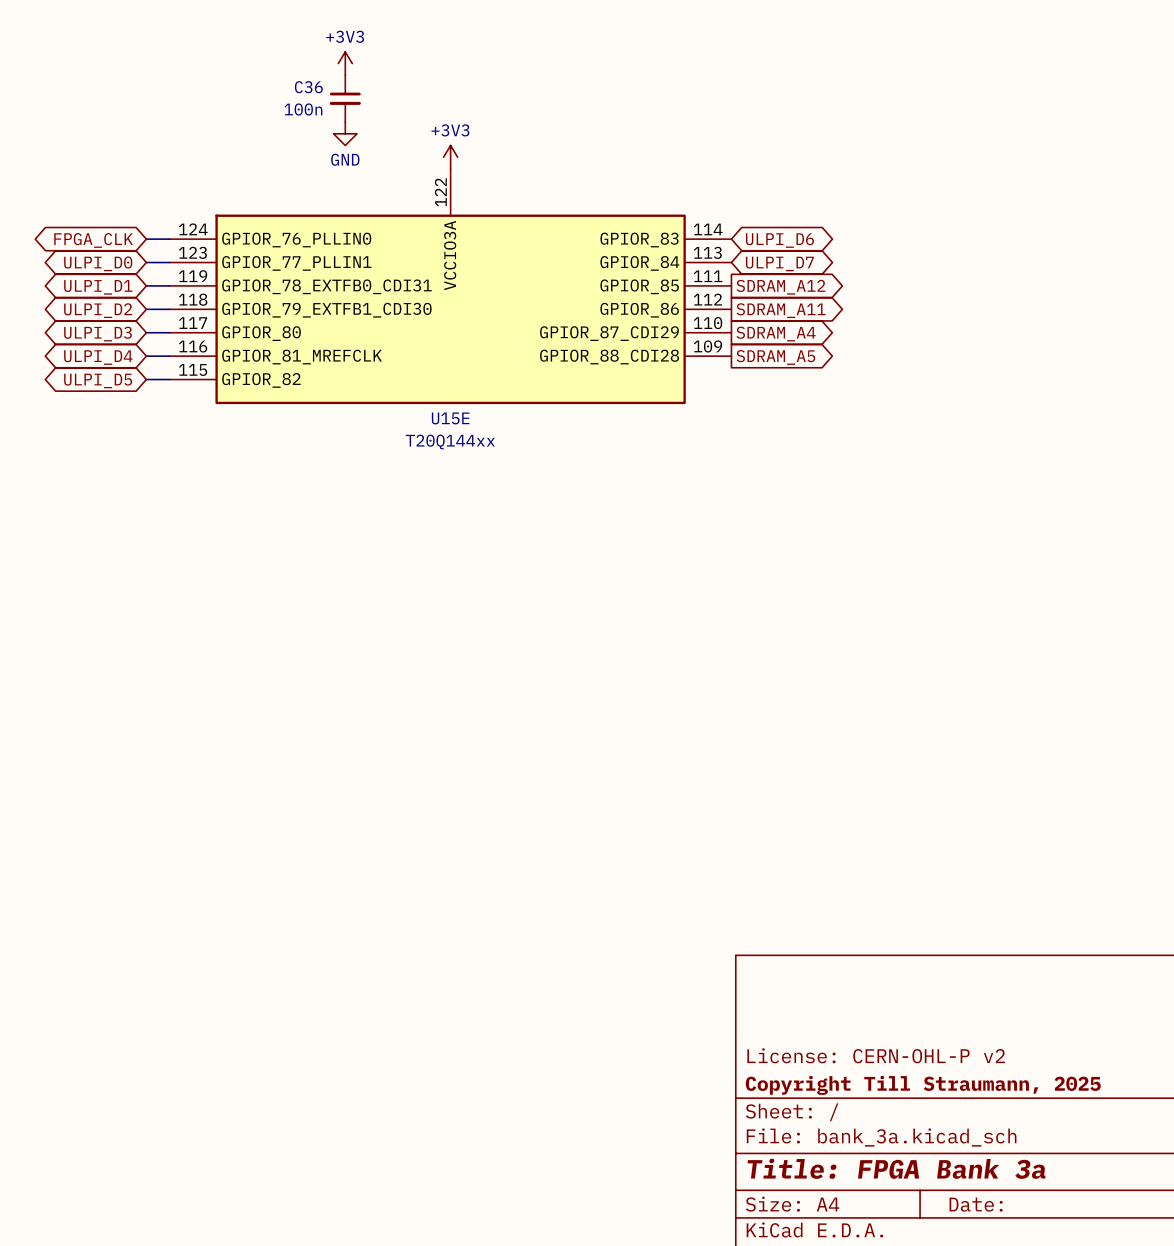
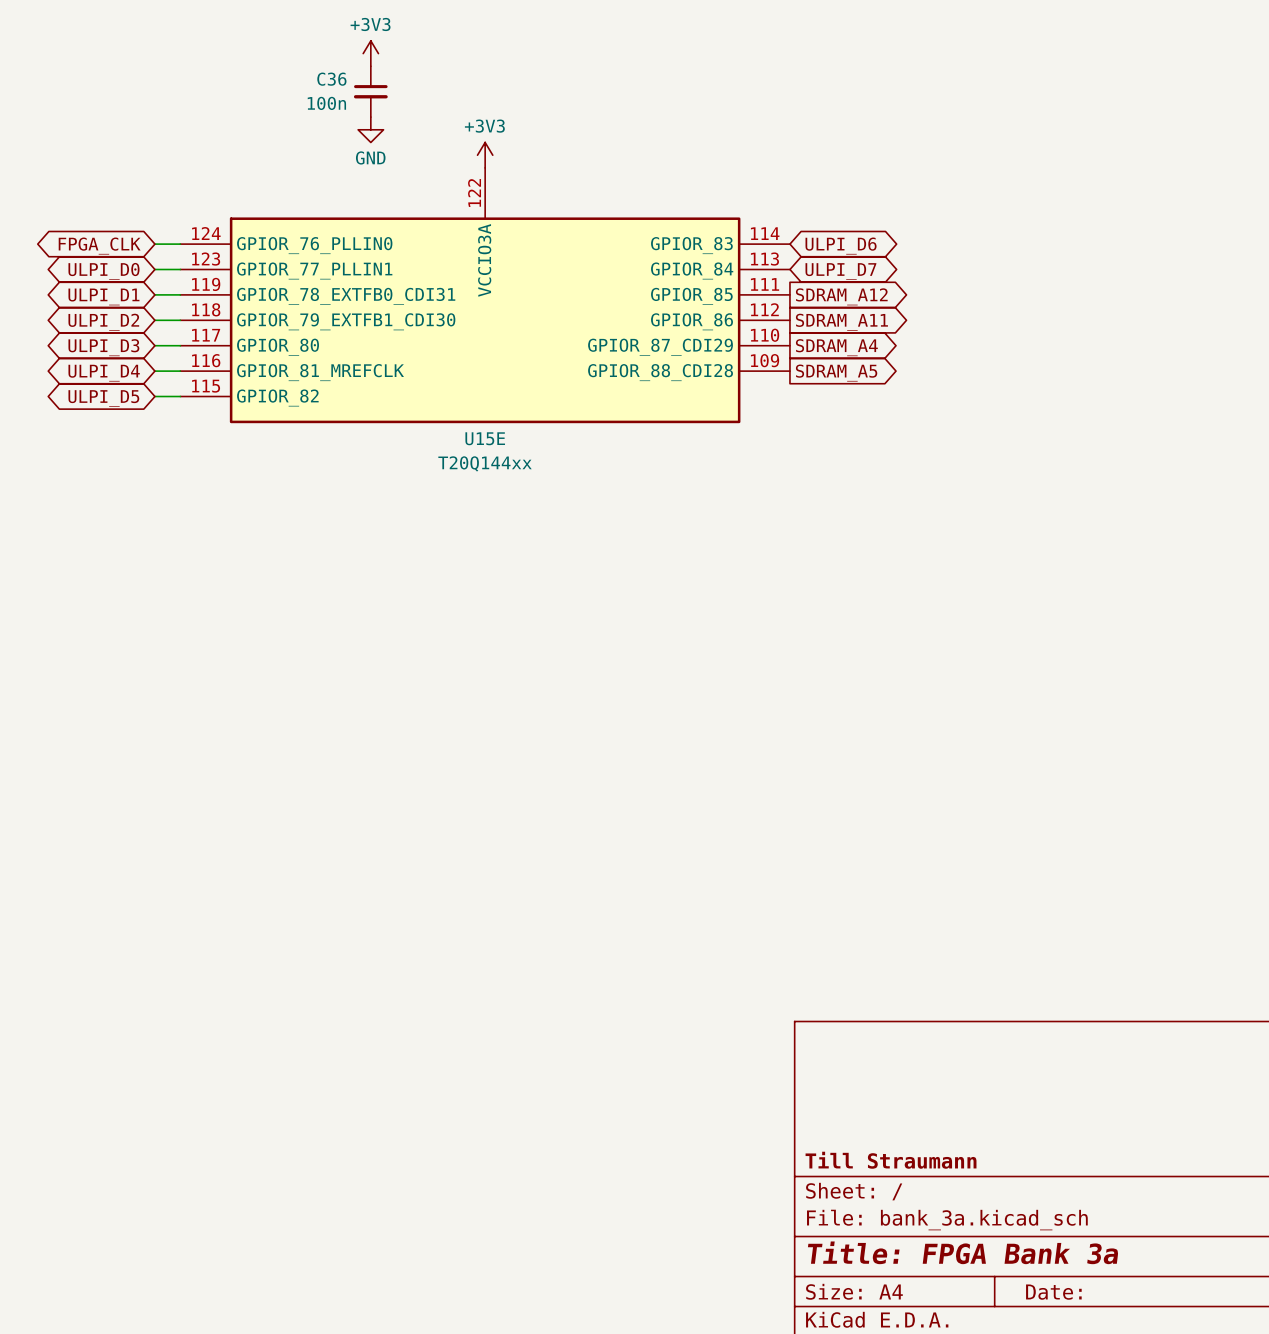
title block: License: CERN-OHL-P v2 (876, 1055) -> none
title block: Copyright Till Straumann, 2025 (923, 1085) -> Till Straumann (891, 1160)

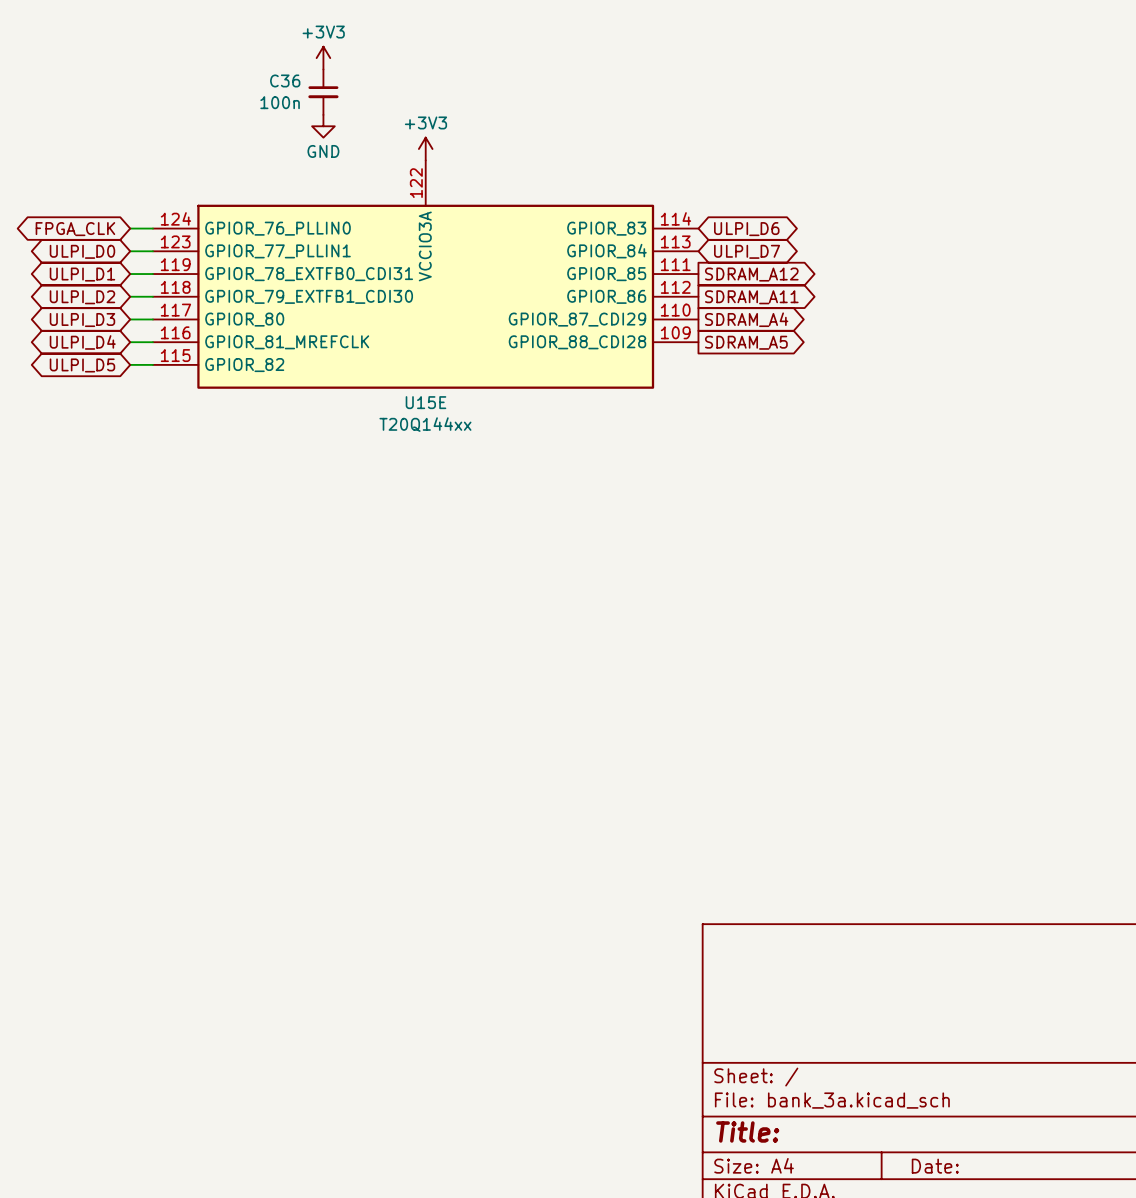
title block: Till Straumann (891, 1160) -> none
title block: Title: FPGA Bank 3a (963, 1252) -> Title: (747, 1131)

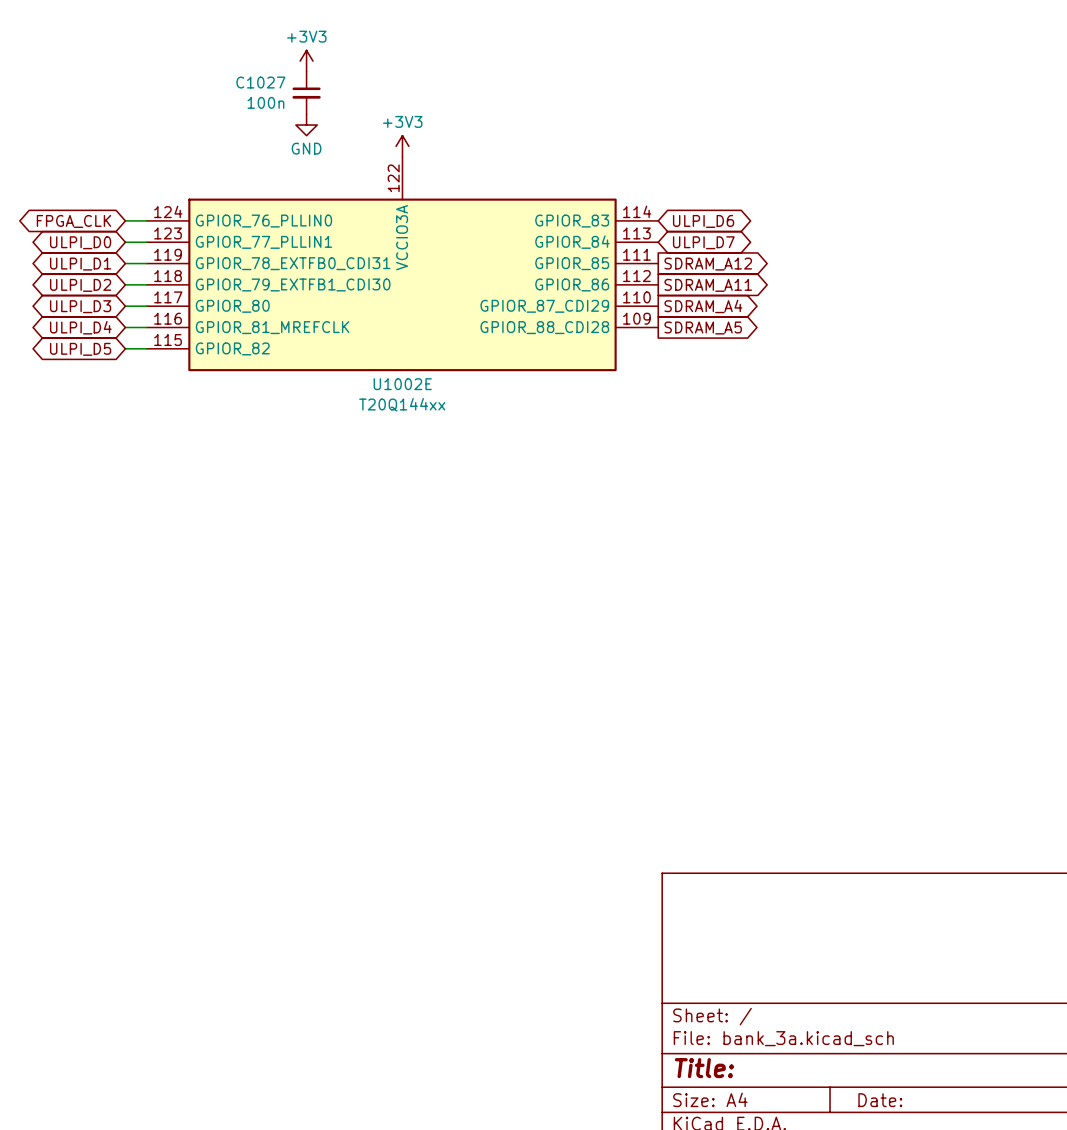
C36 name: C36 (285, 80) -> C1027 (260, 82)
U15E name: U15E (425, 402) -> U1002E (402, 384)

